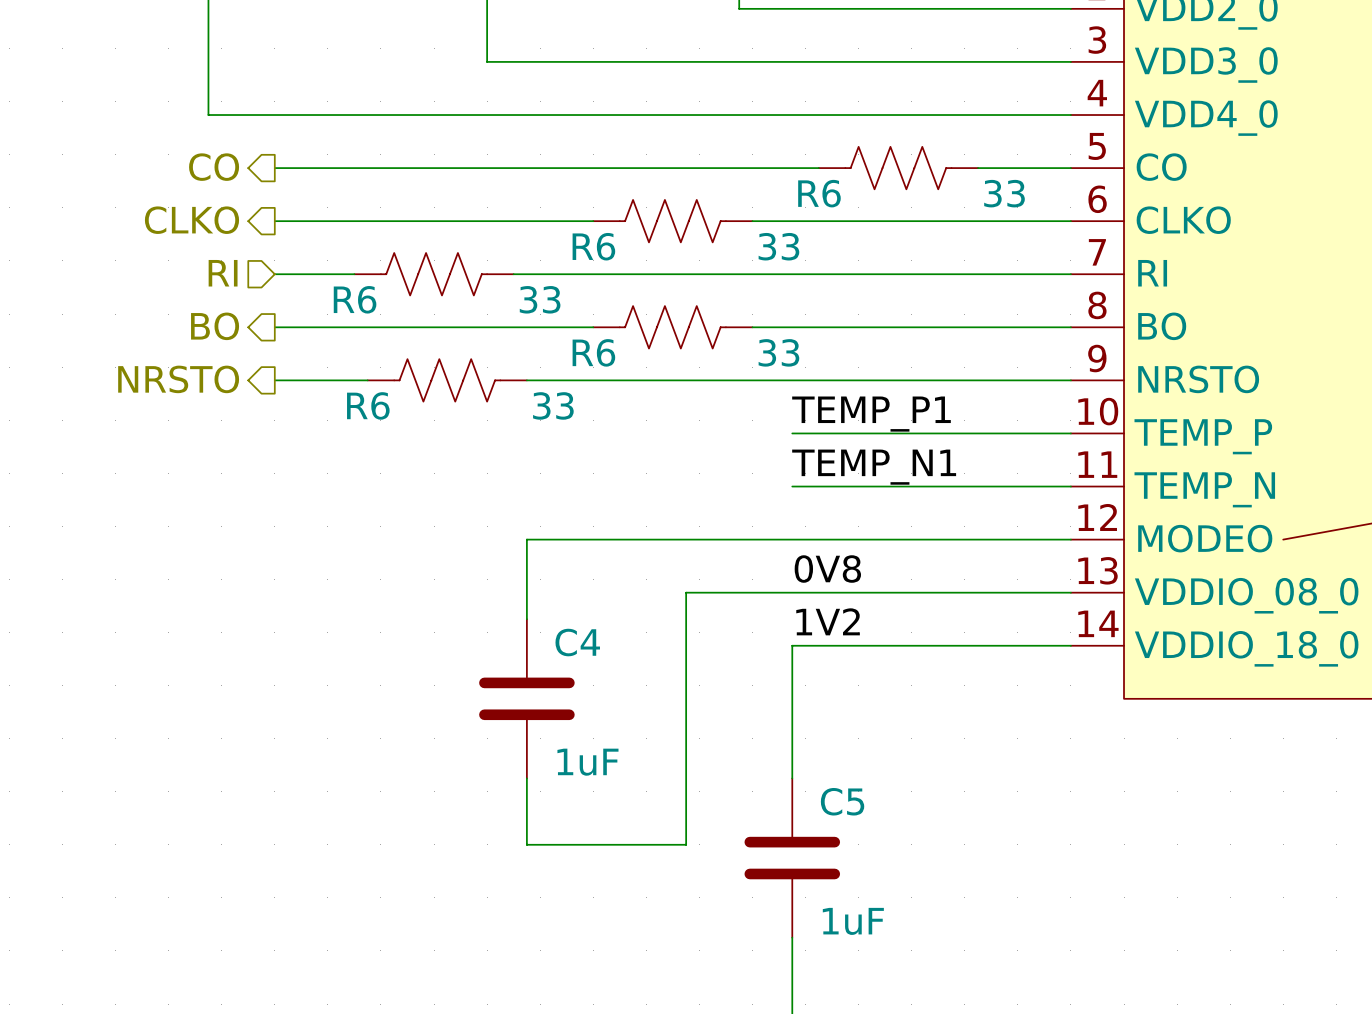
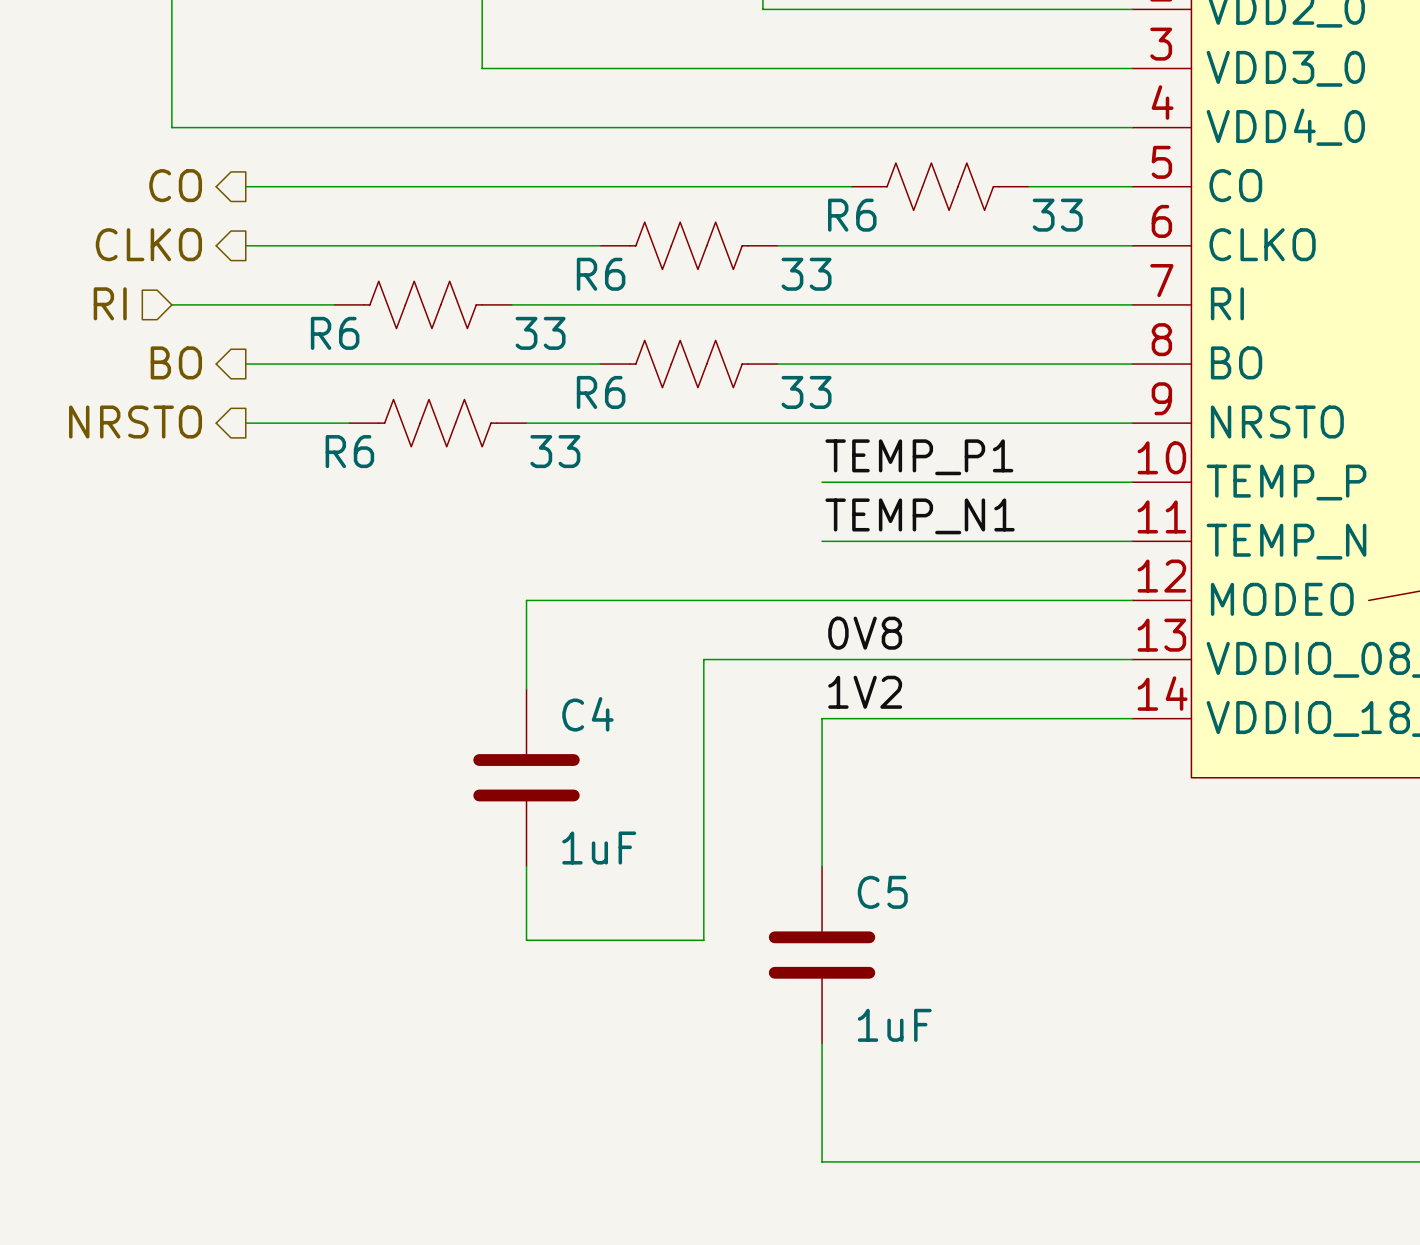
hierarchical label position: RI (223, 273) -> RI (110, 303)
wire: none -> (171, 304) (245, 304)

